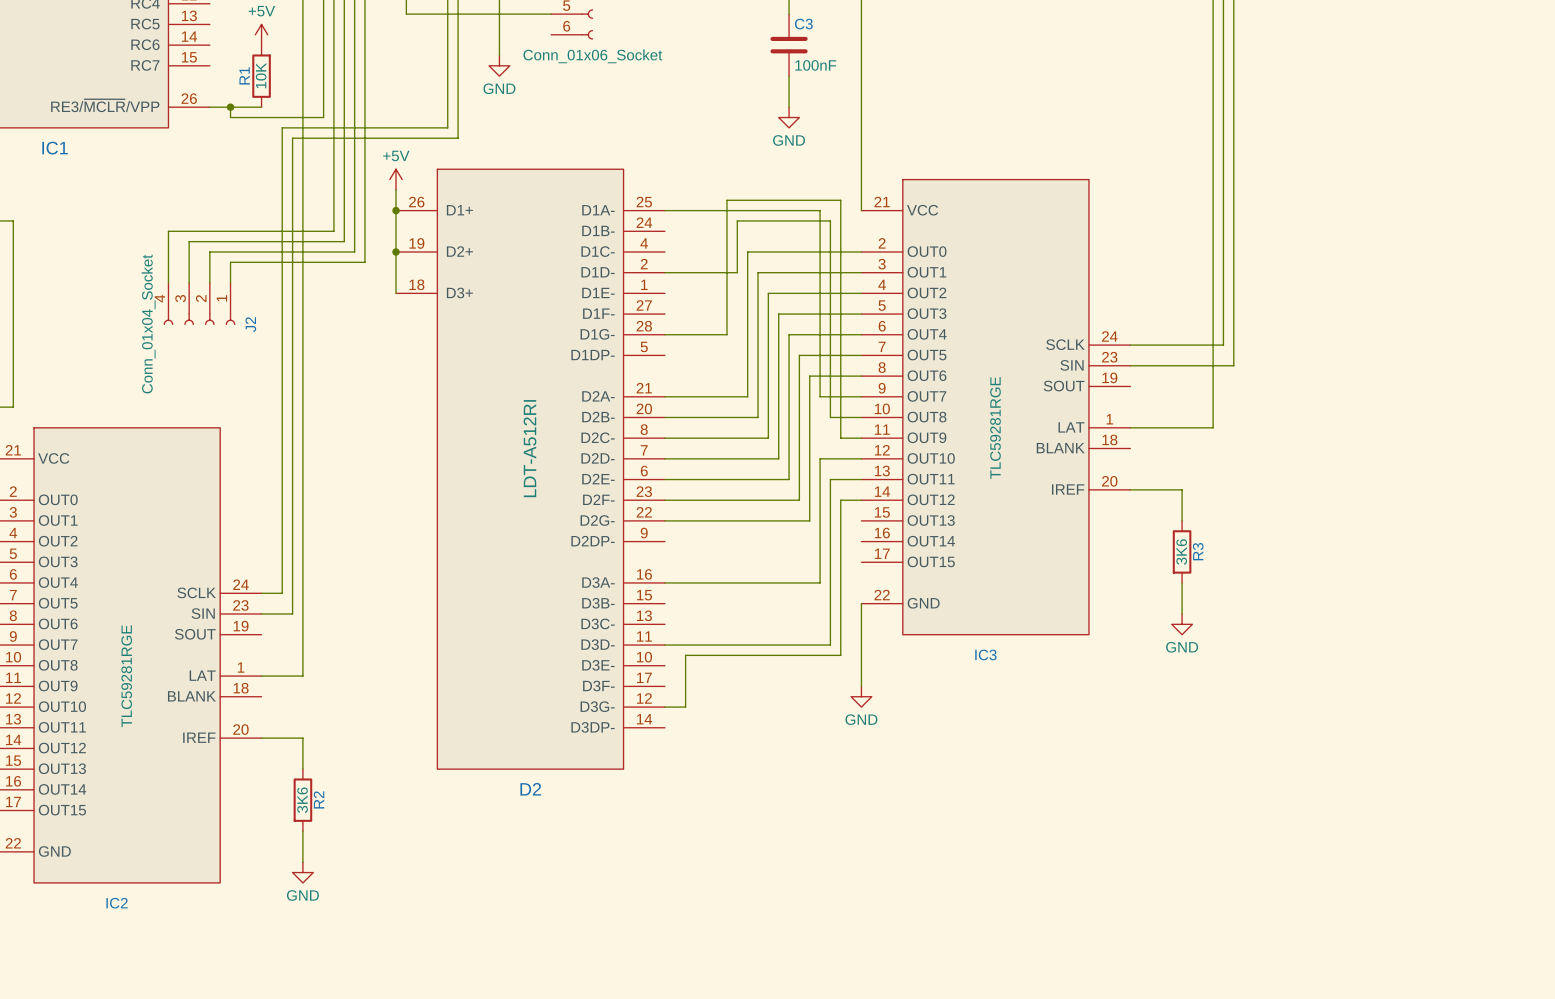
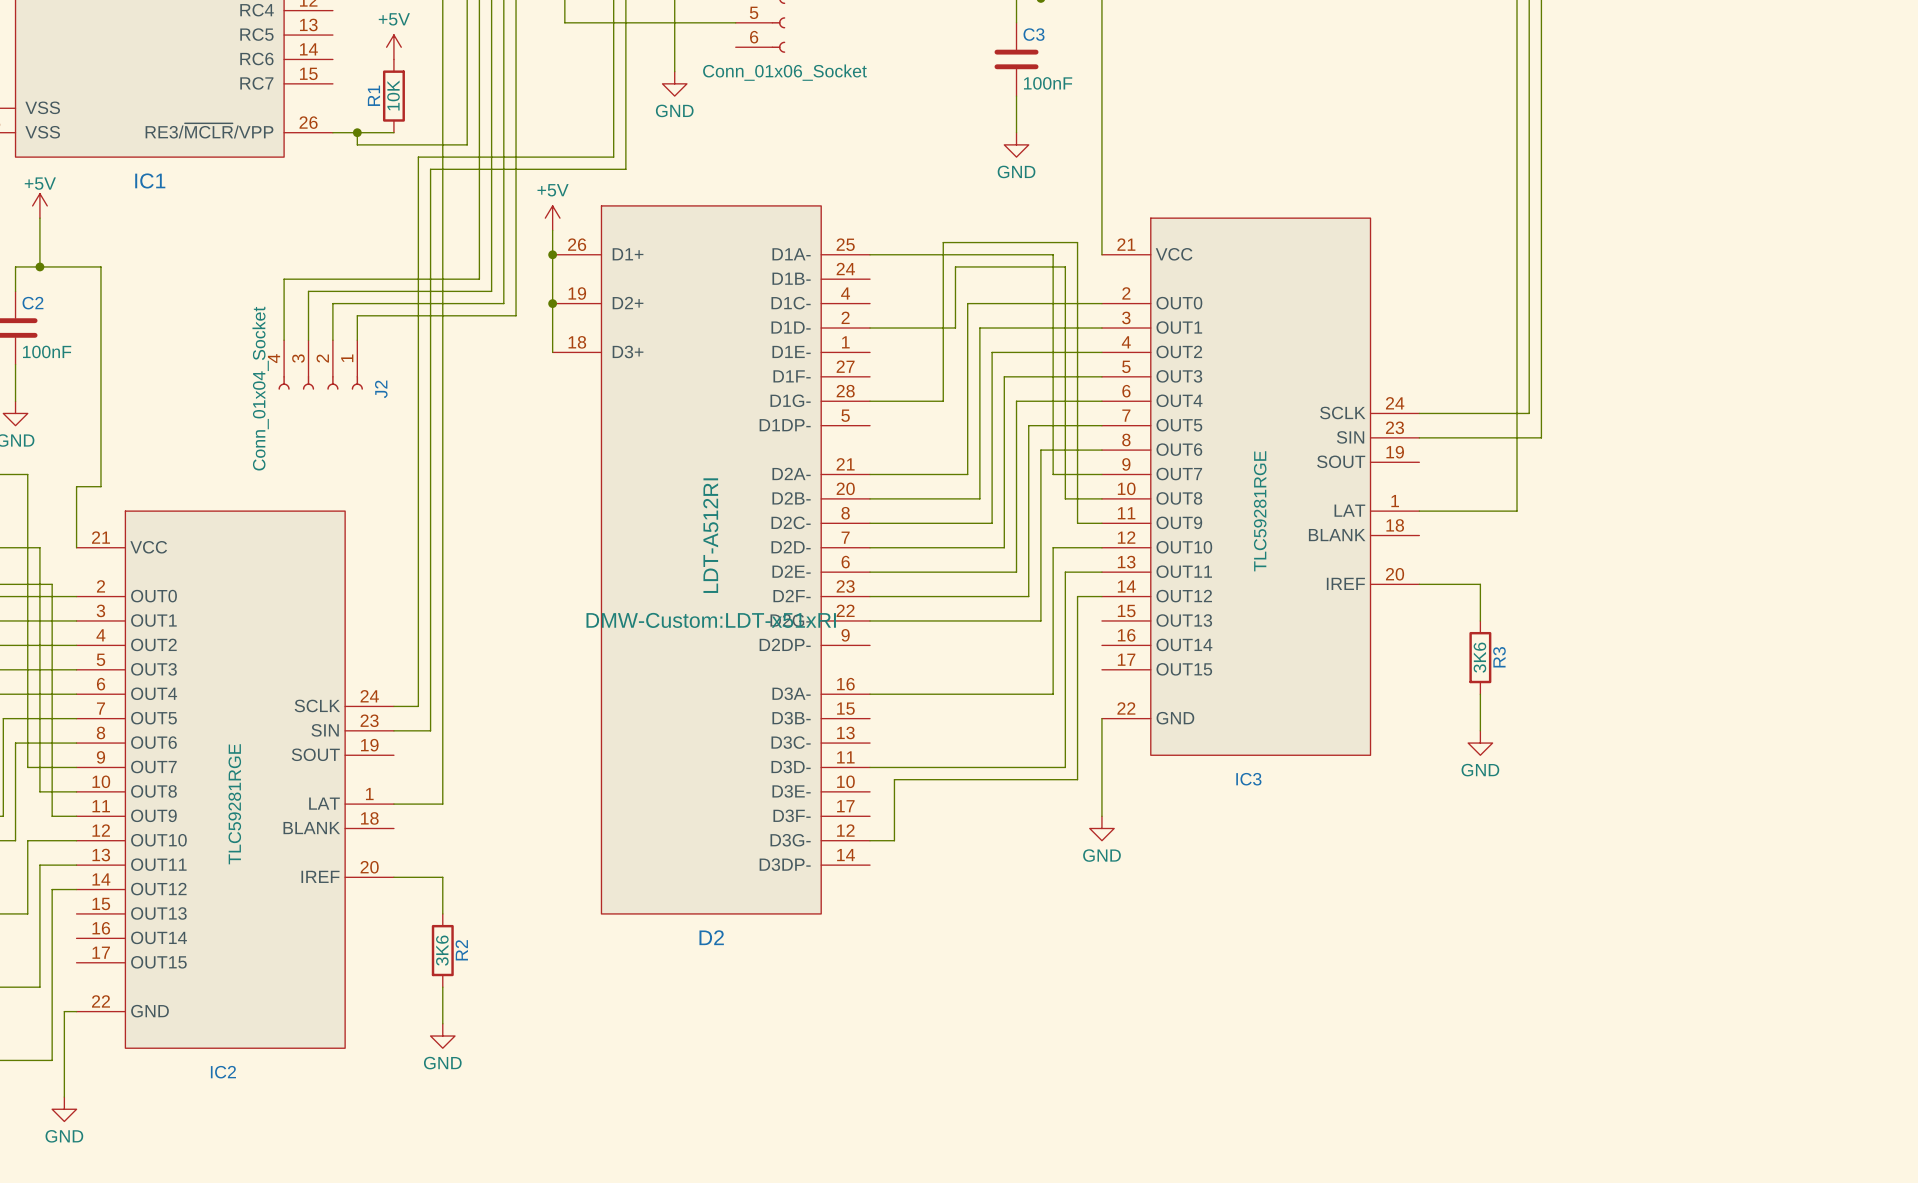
D2 text: none -> DMW-Custom:LDT-x51xRI (711, 620)

